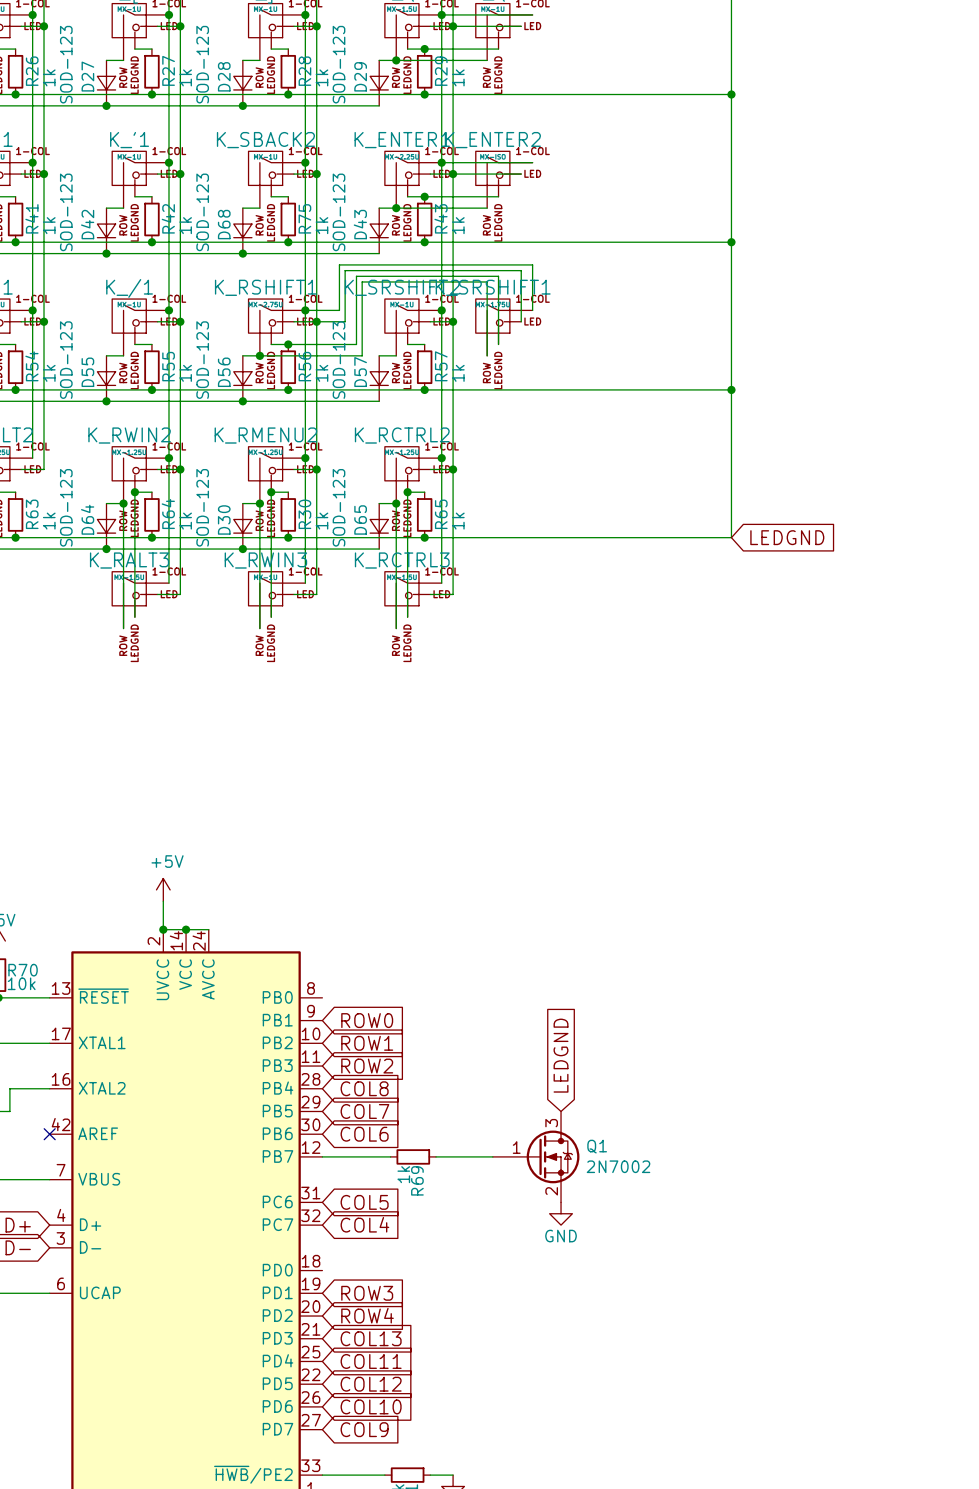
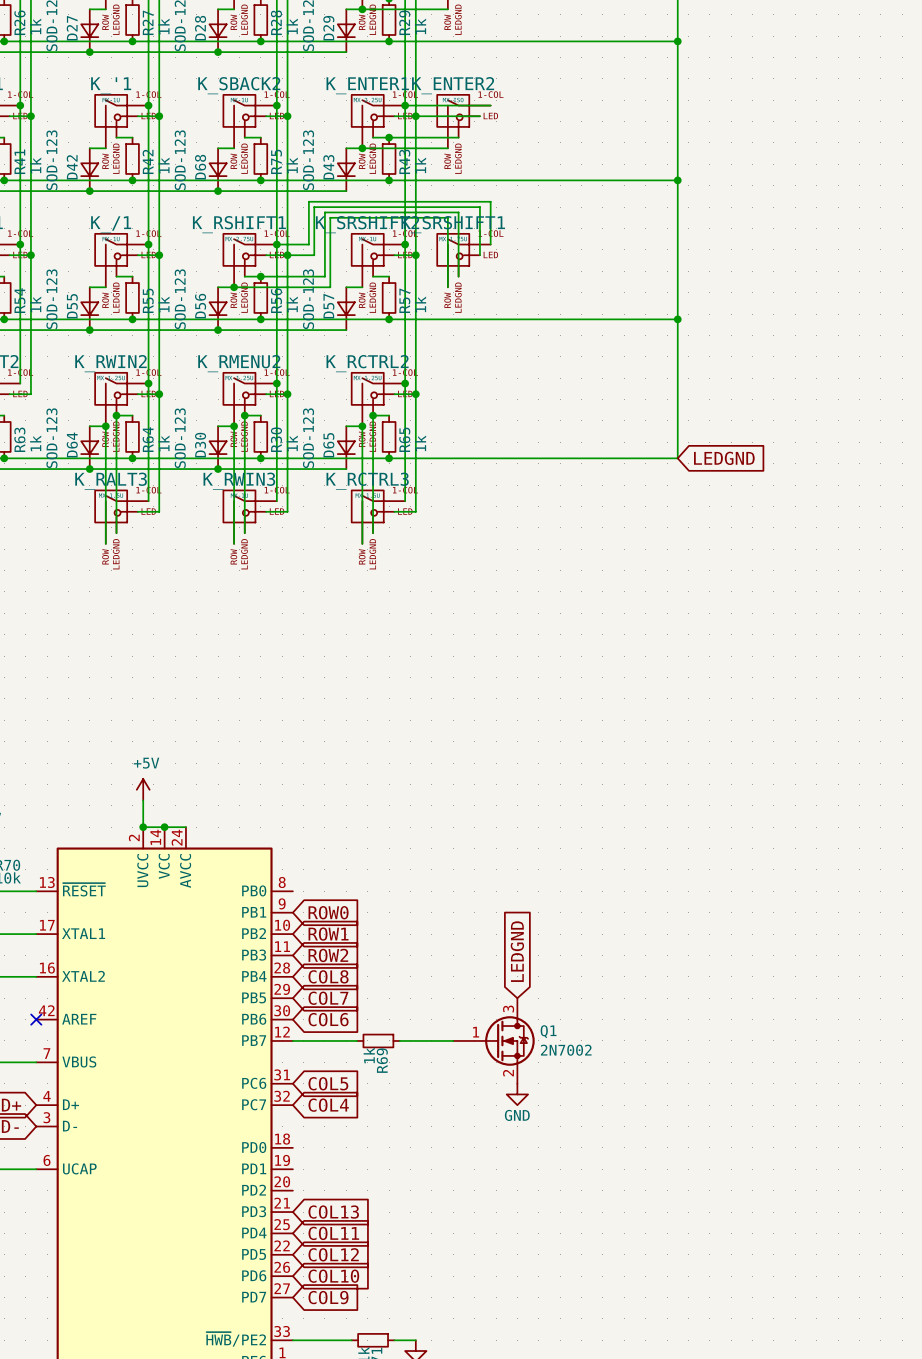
global label: ROW3 (367, 1293) -> none
global label: ROW4 (367, 1315) -> none

